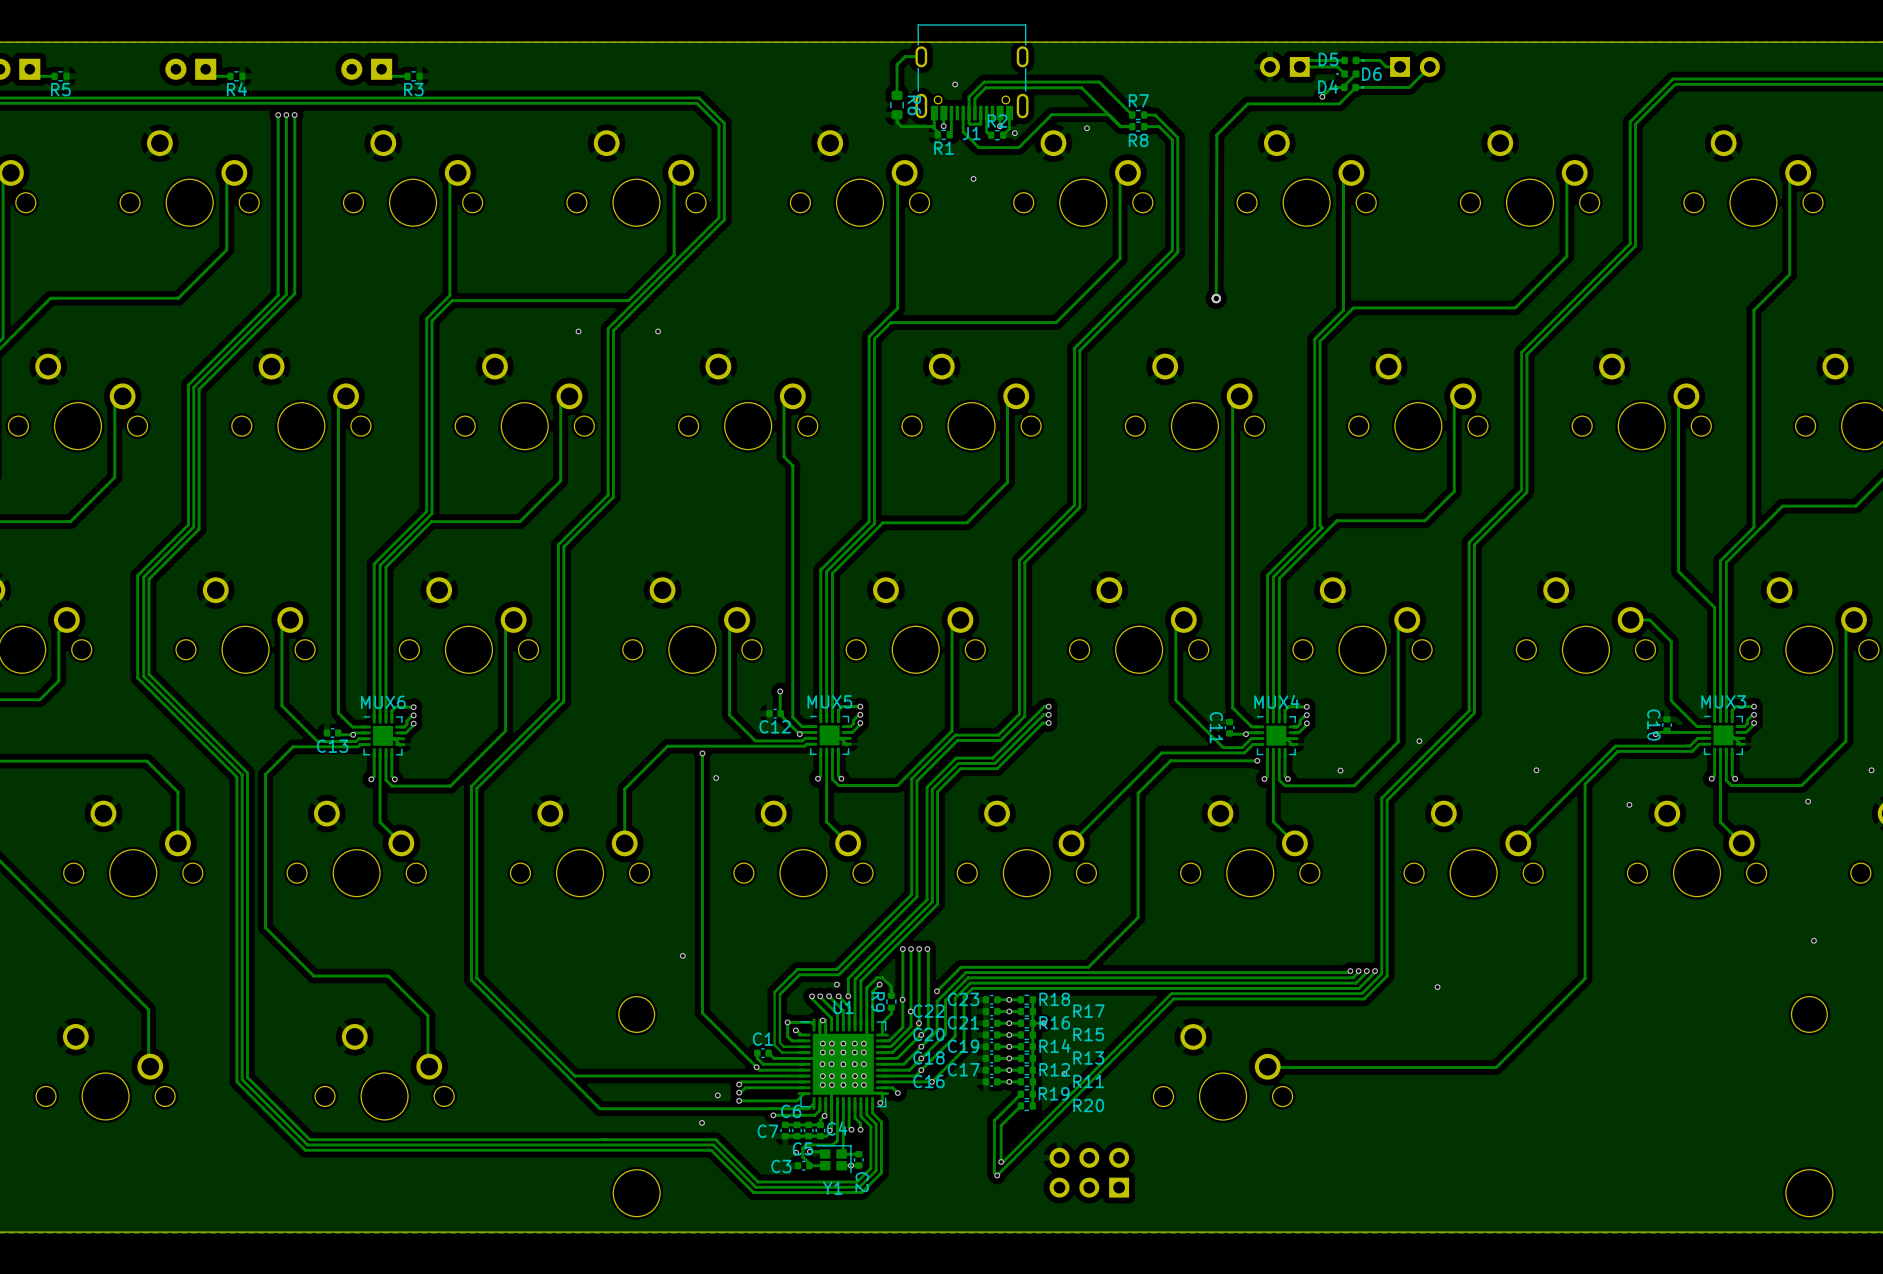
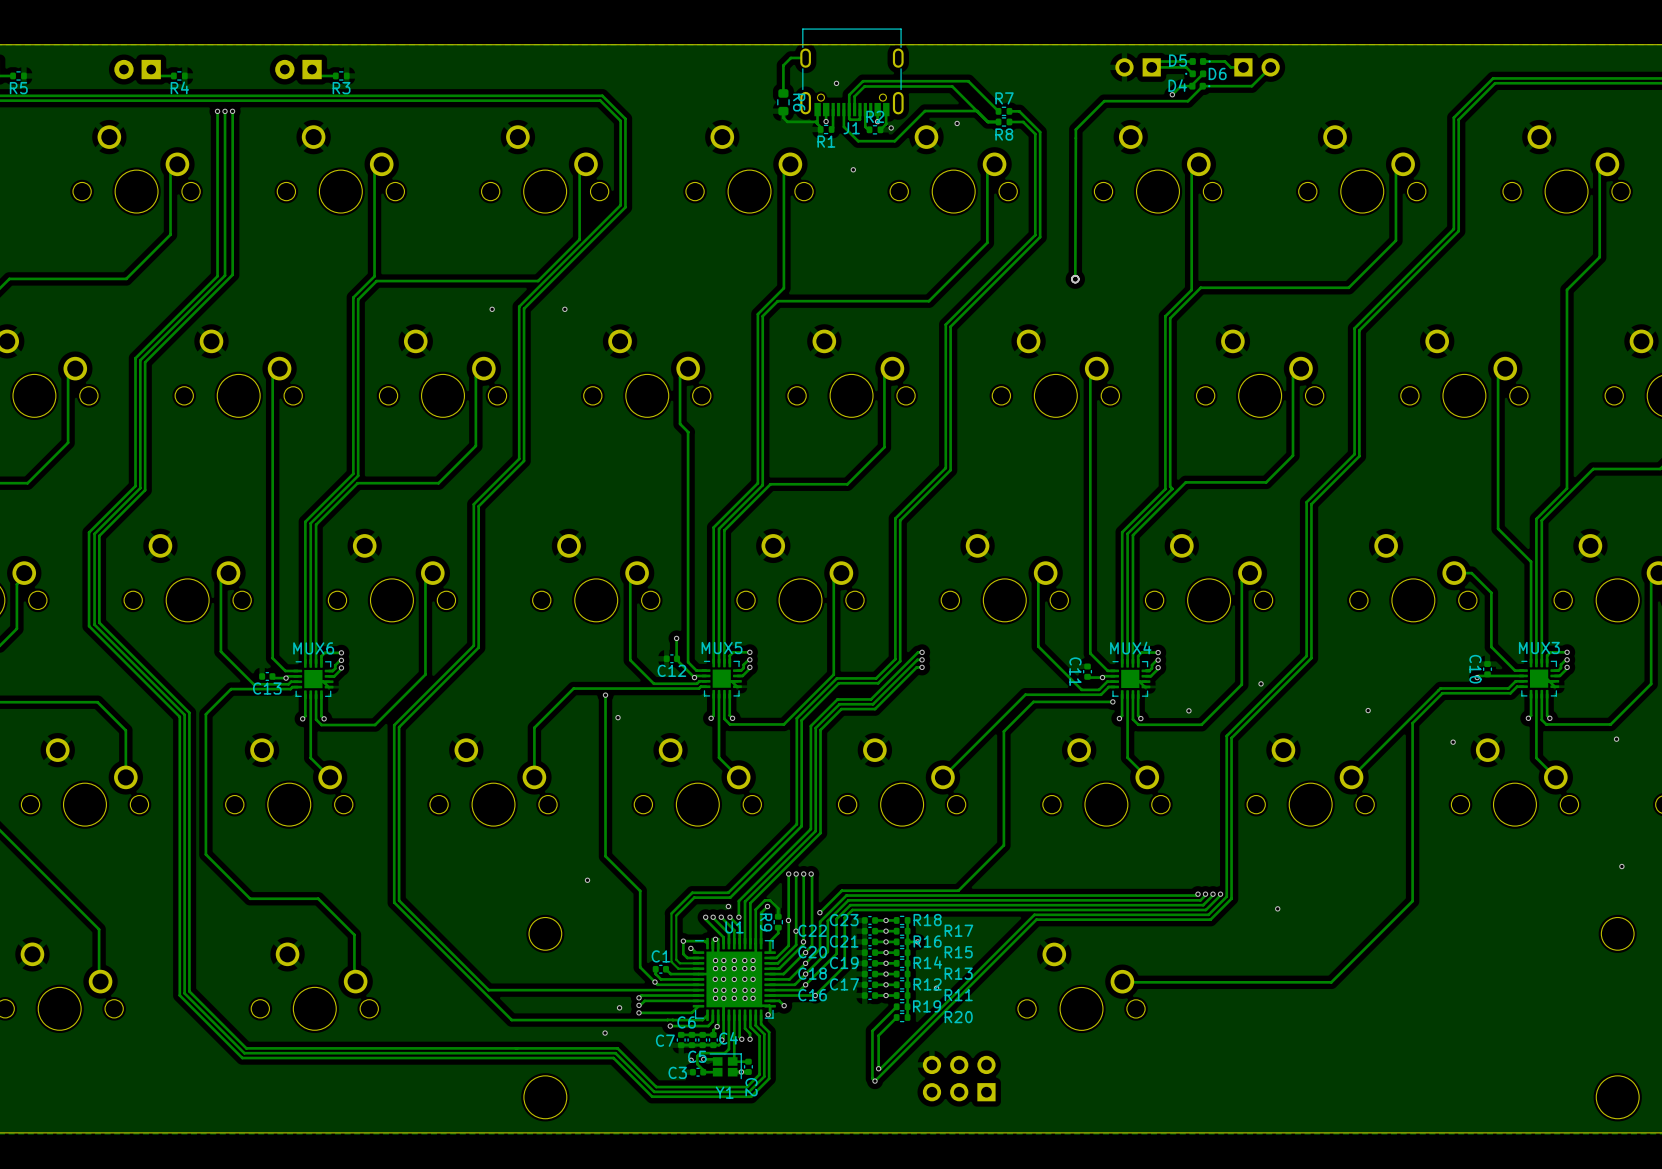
track: (702, 929) (702, 1013) (740, 1051) -> (605, 856) (640, 890) (640, 967)

